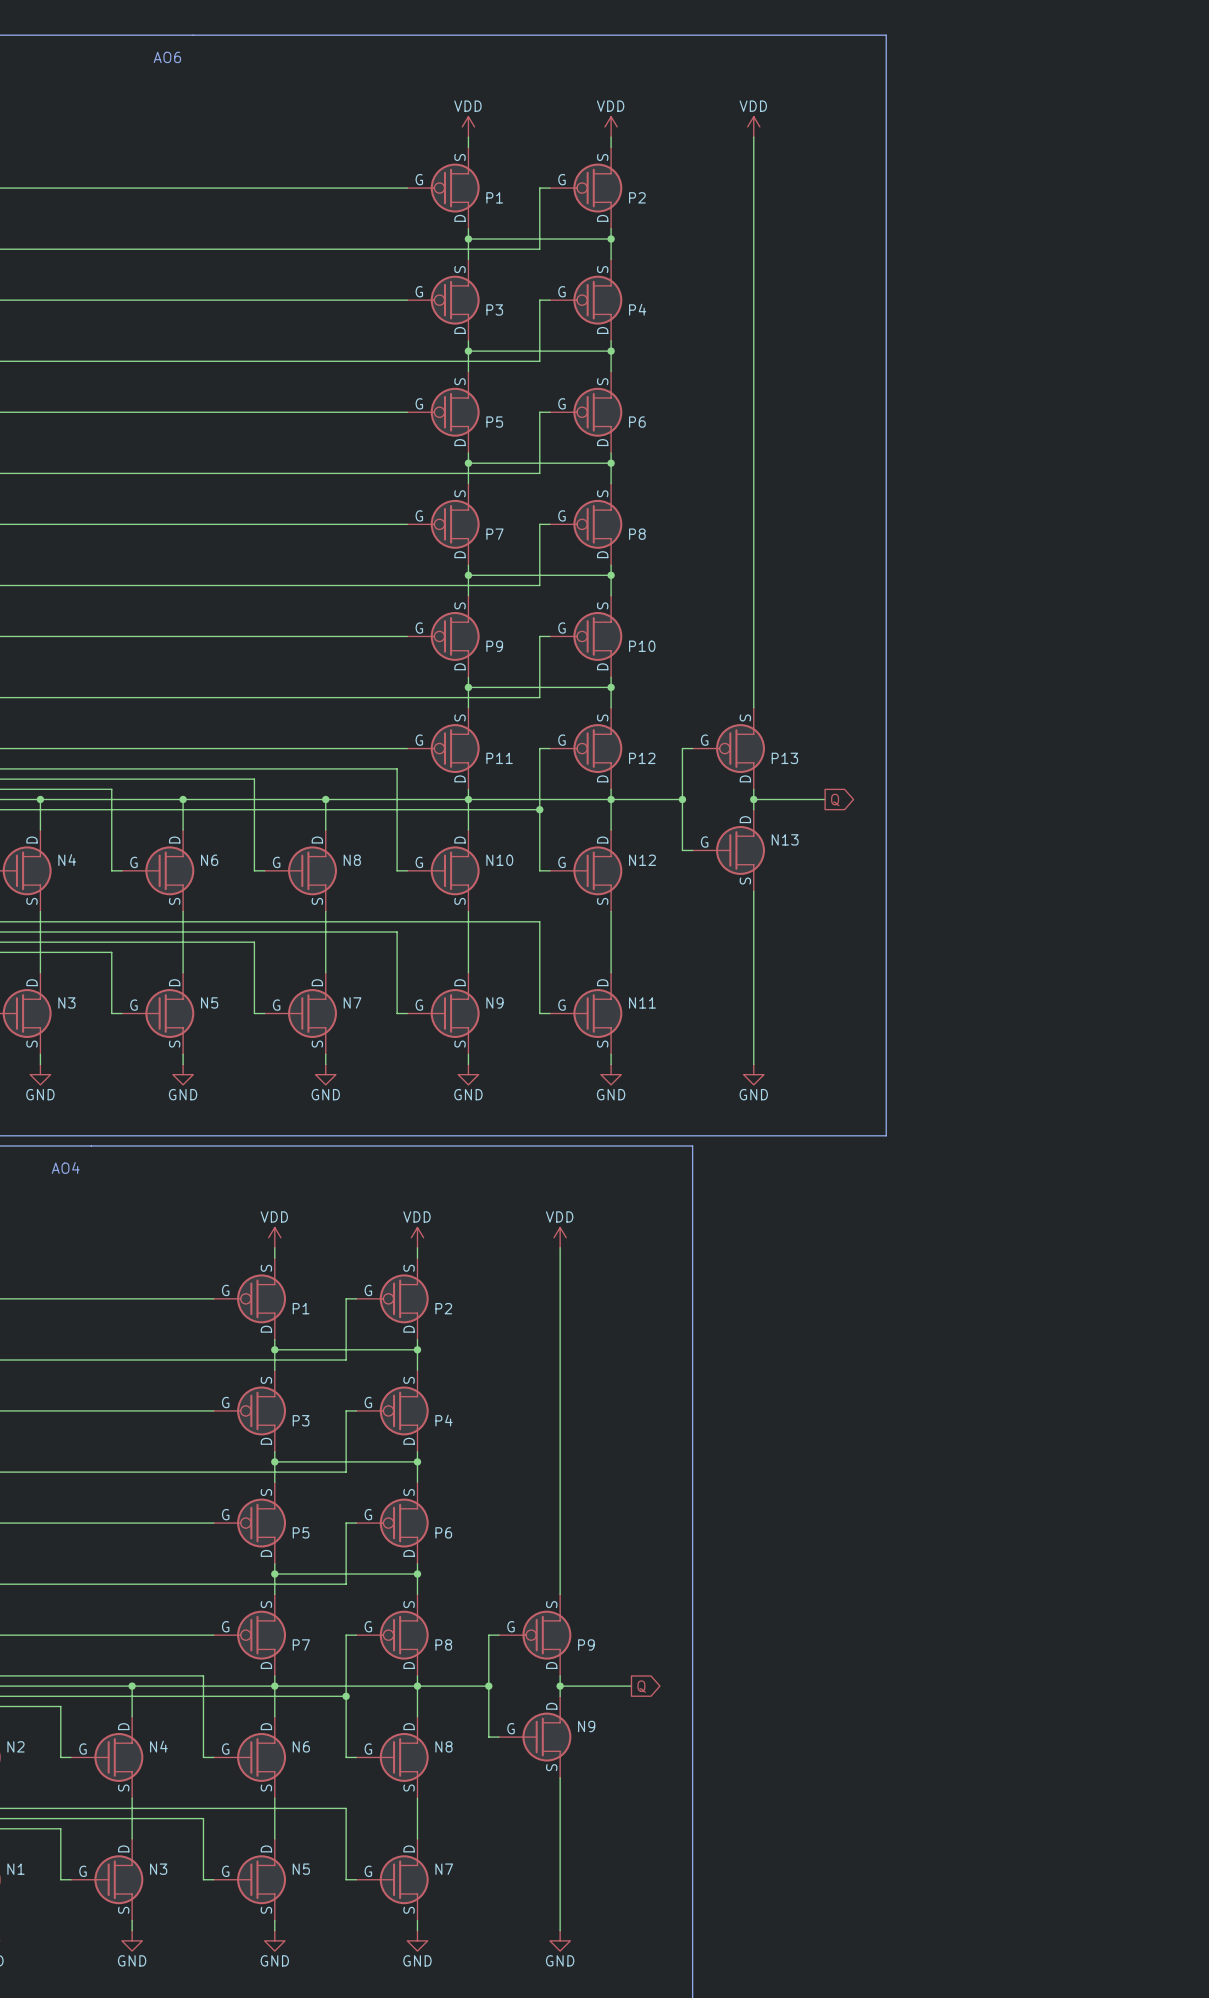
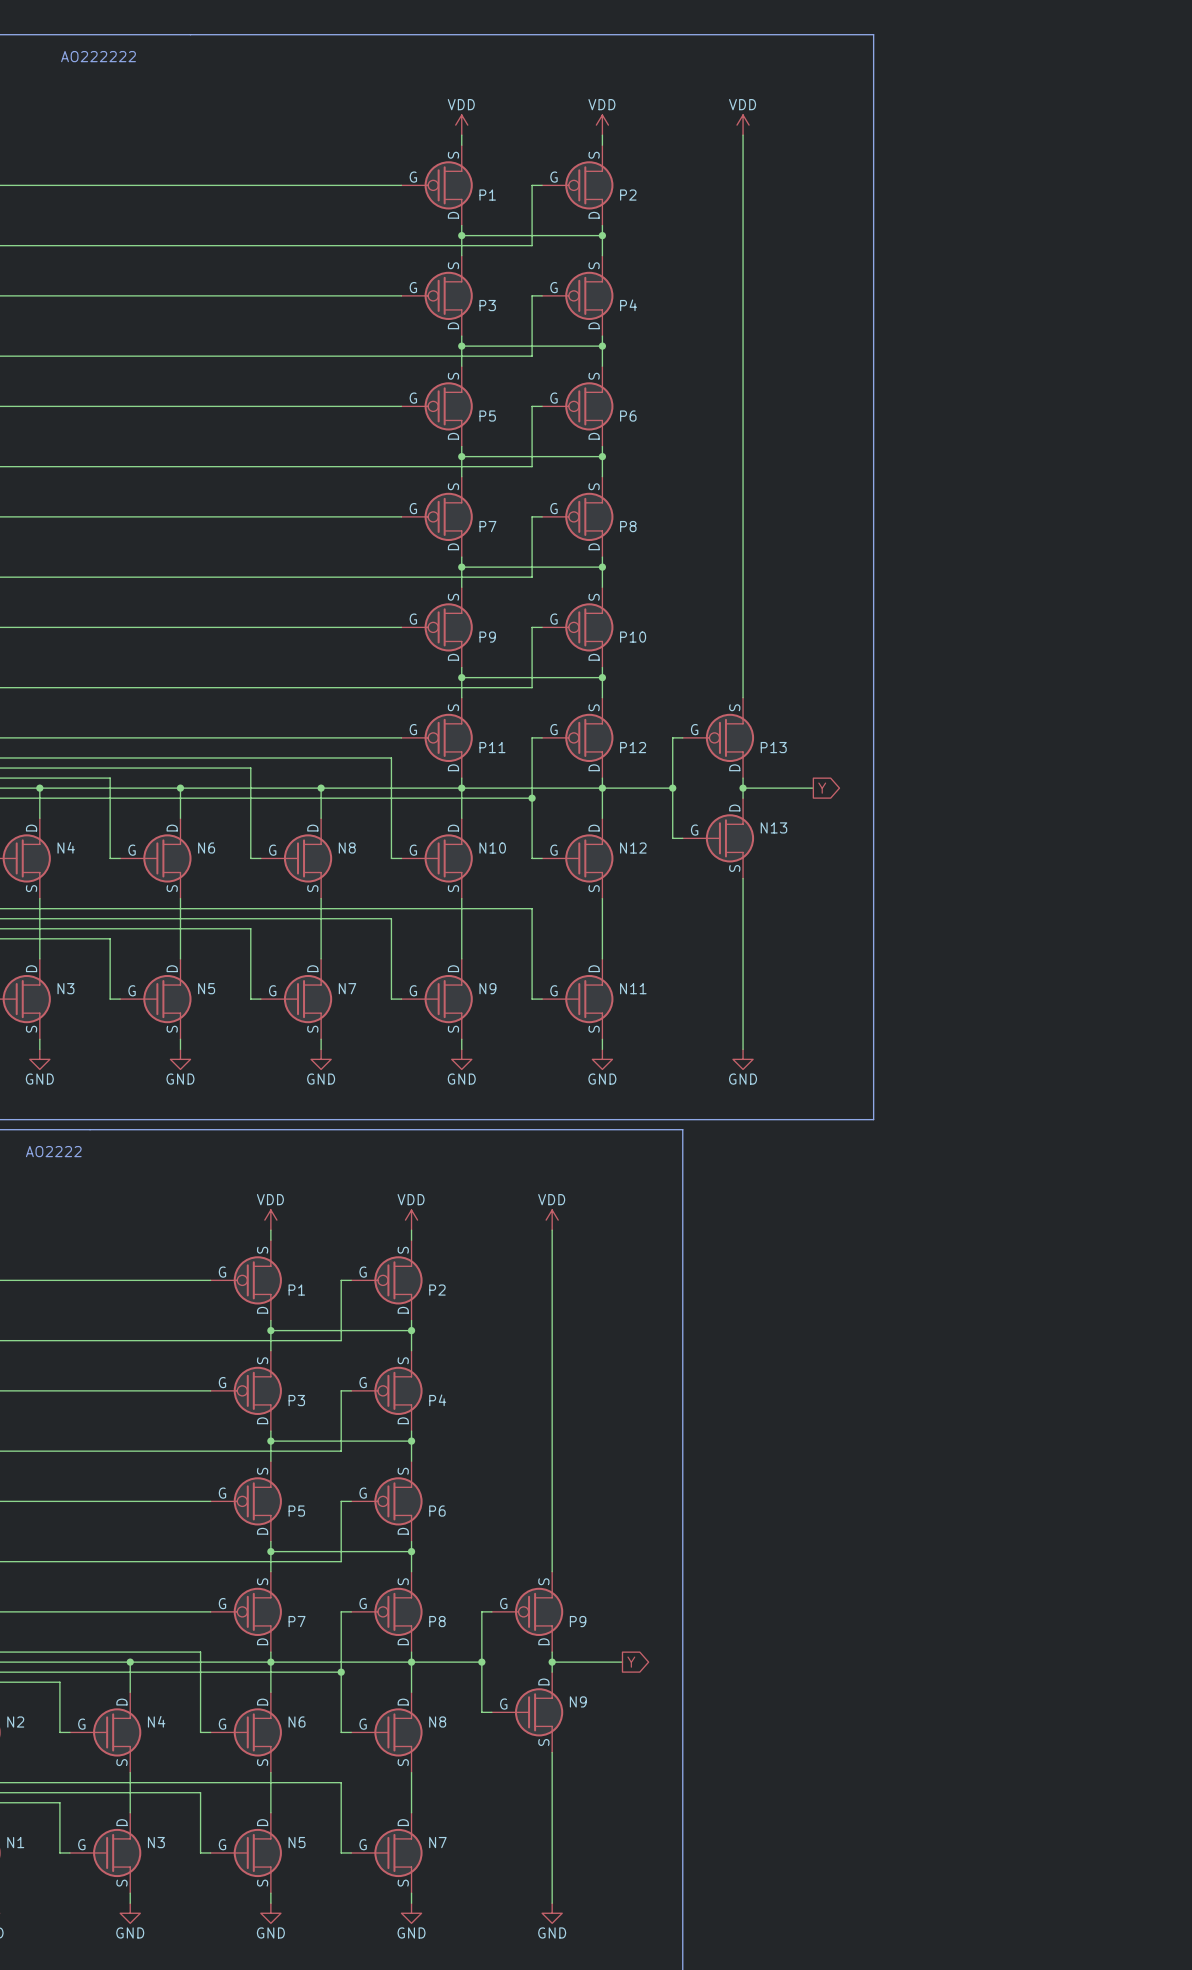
text: none -> AO222222 (98, 56)
text: AO6 (167, 57) -> none
global label: Q (835, 799) -> Y (822, 788)
text: AO4 (65, 1167) -> none
text: none -> AO2222 (53, 1151)
global label: Q (641, 1686) -> Y (631, 1662)

